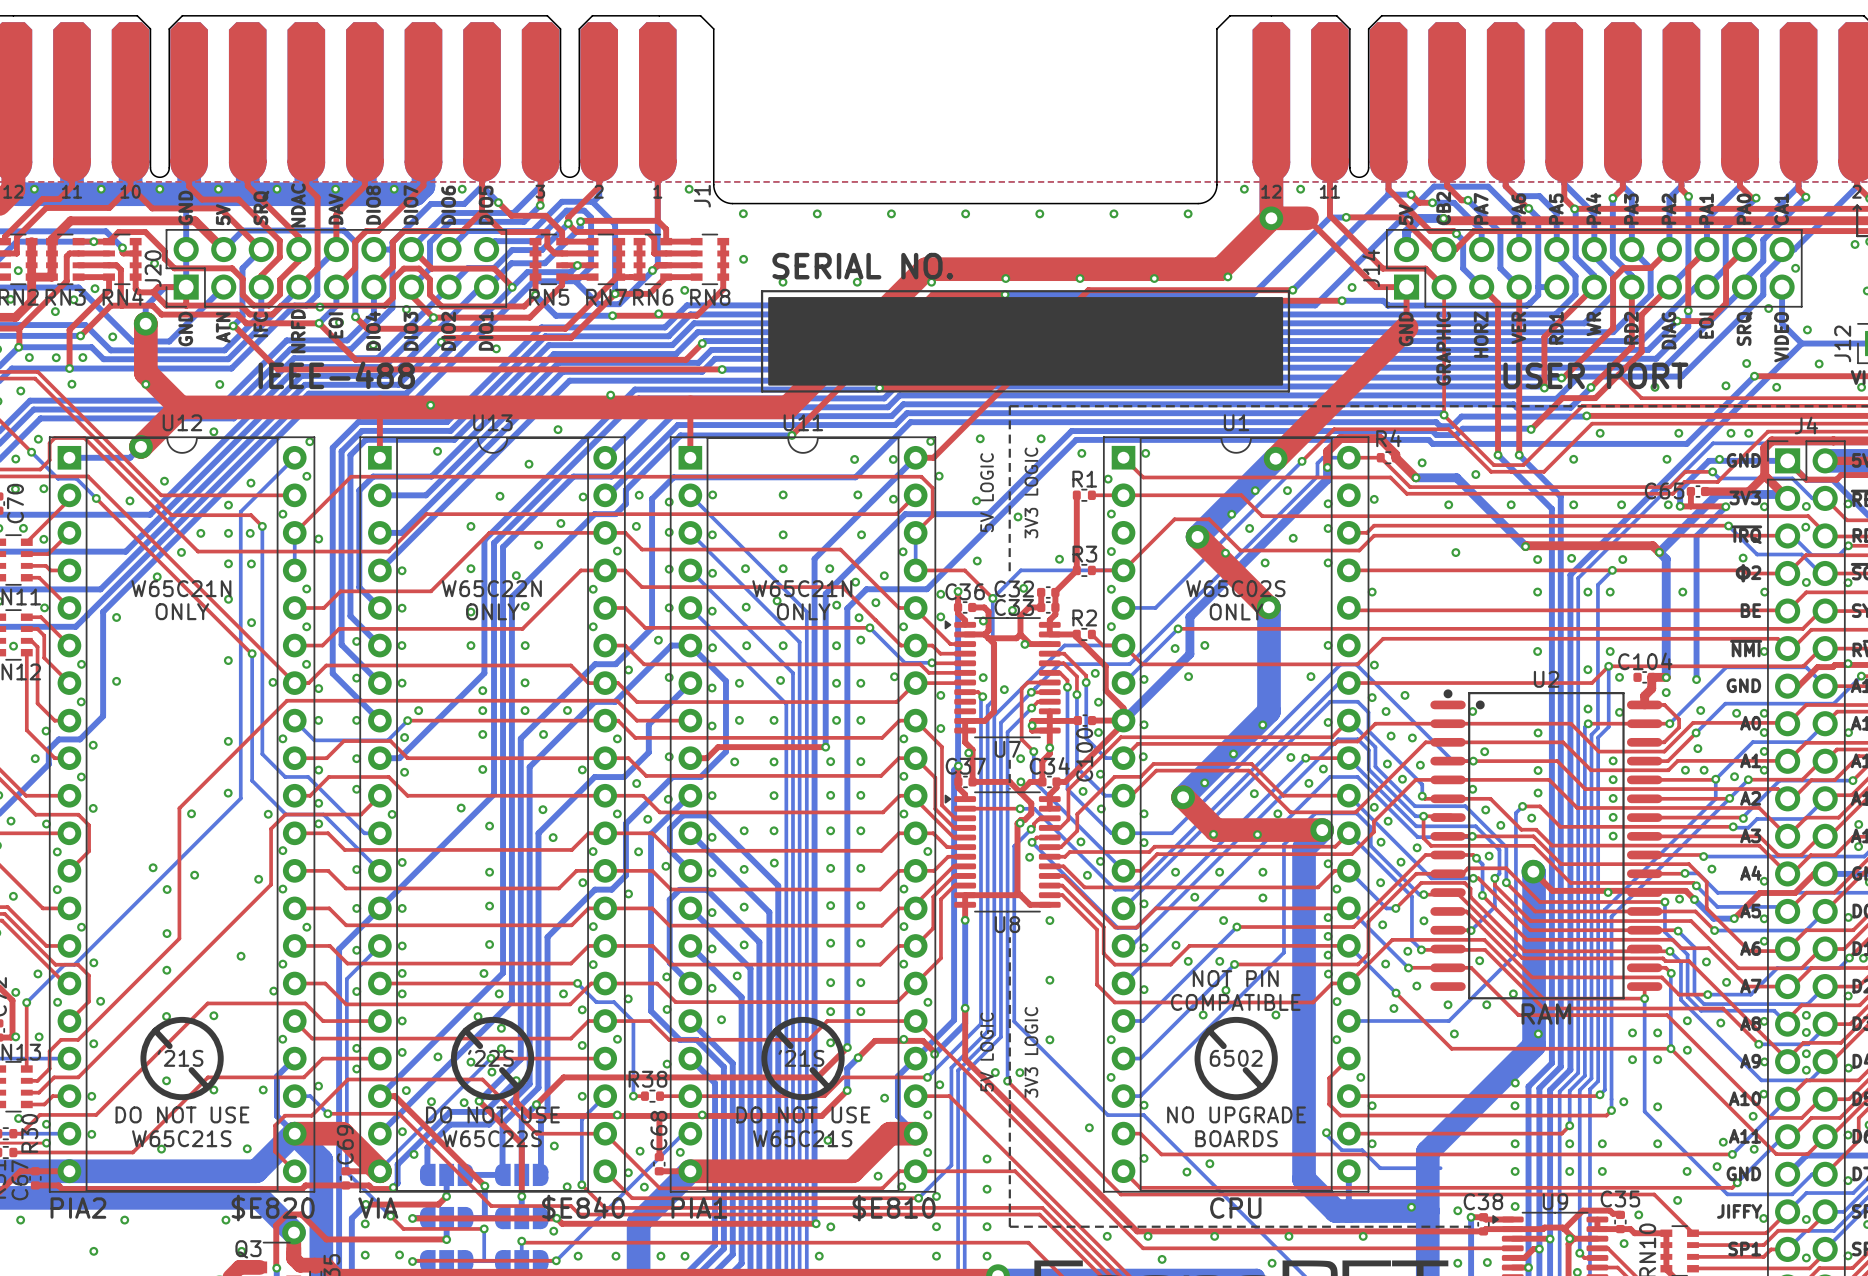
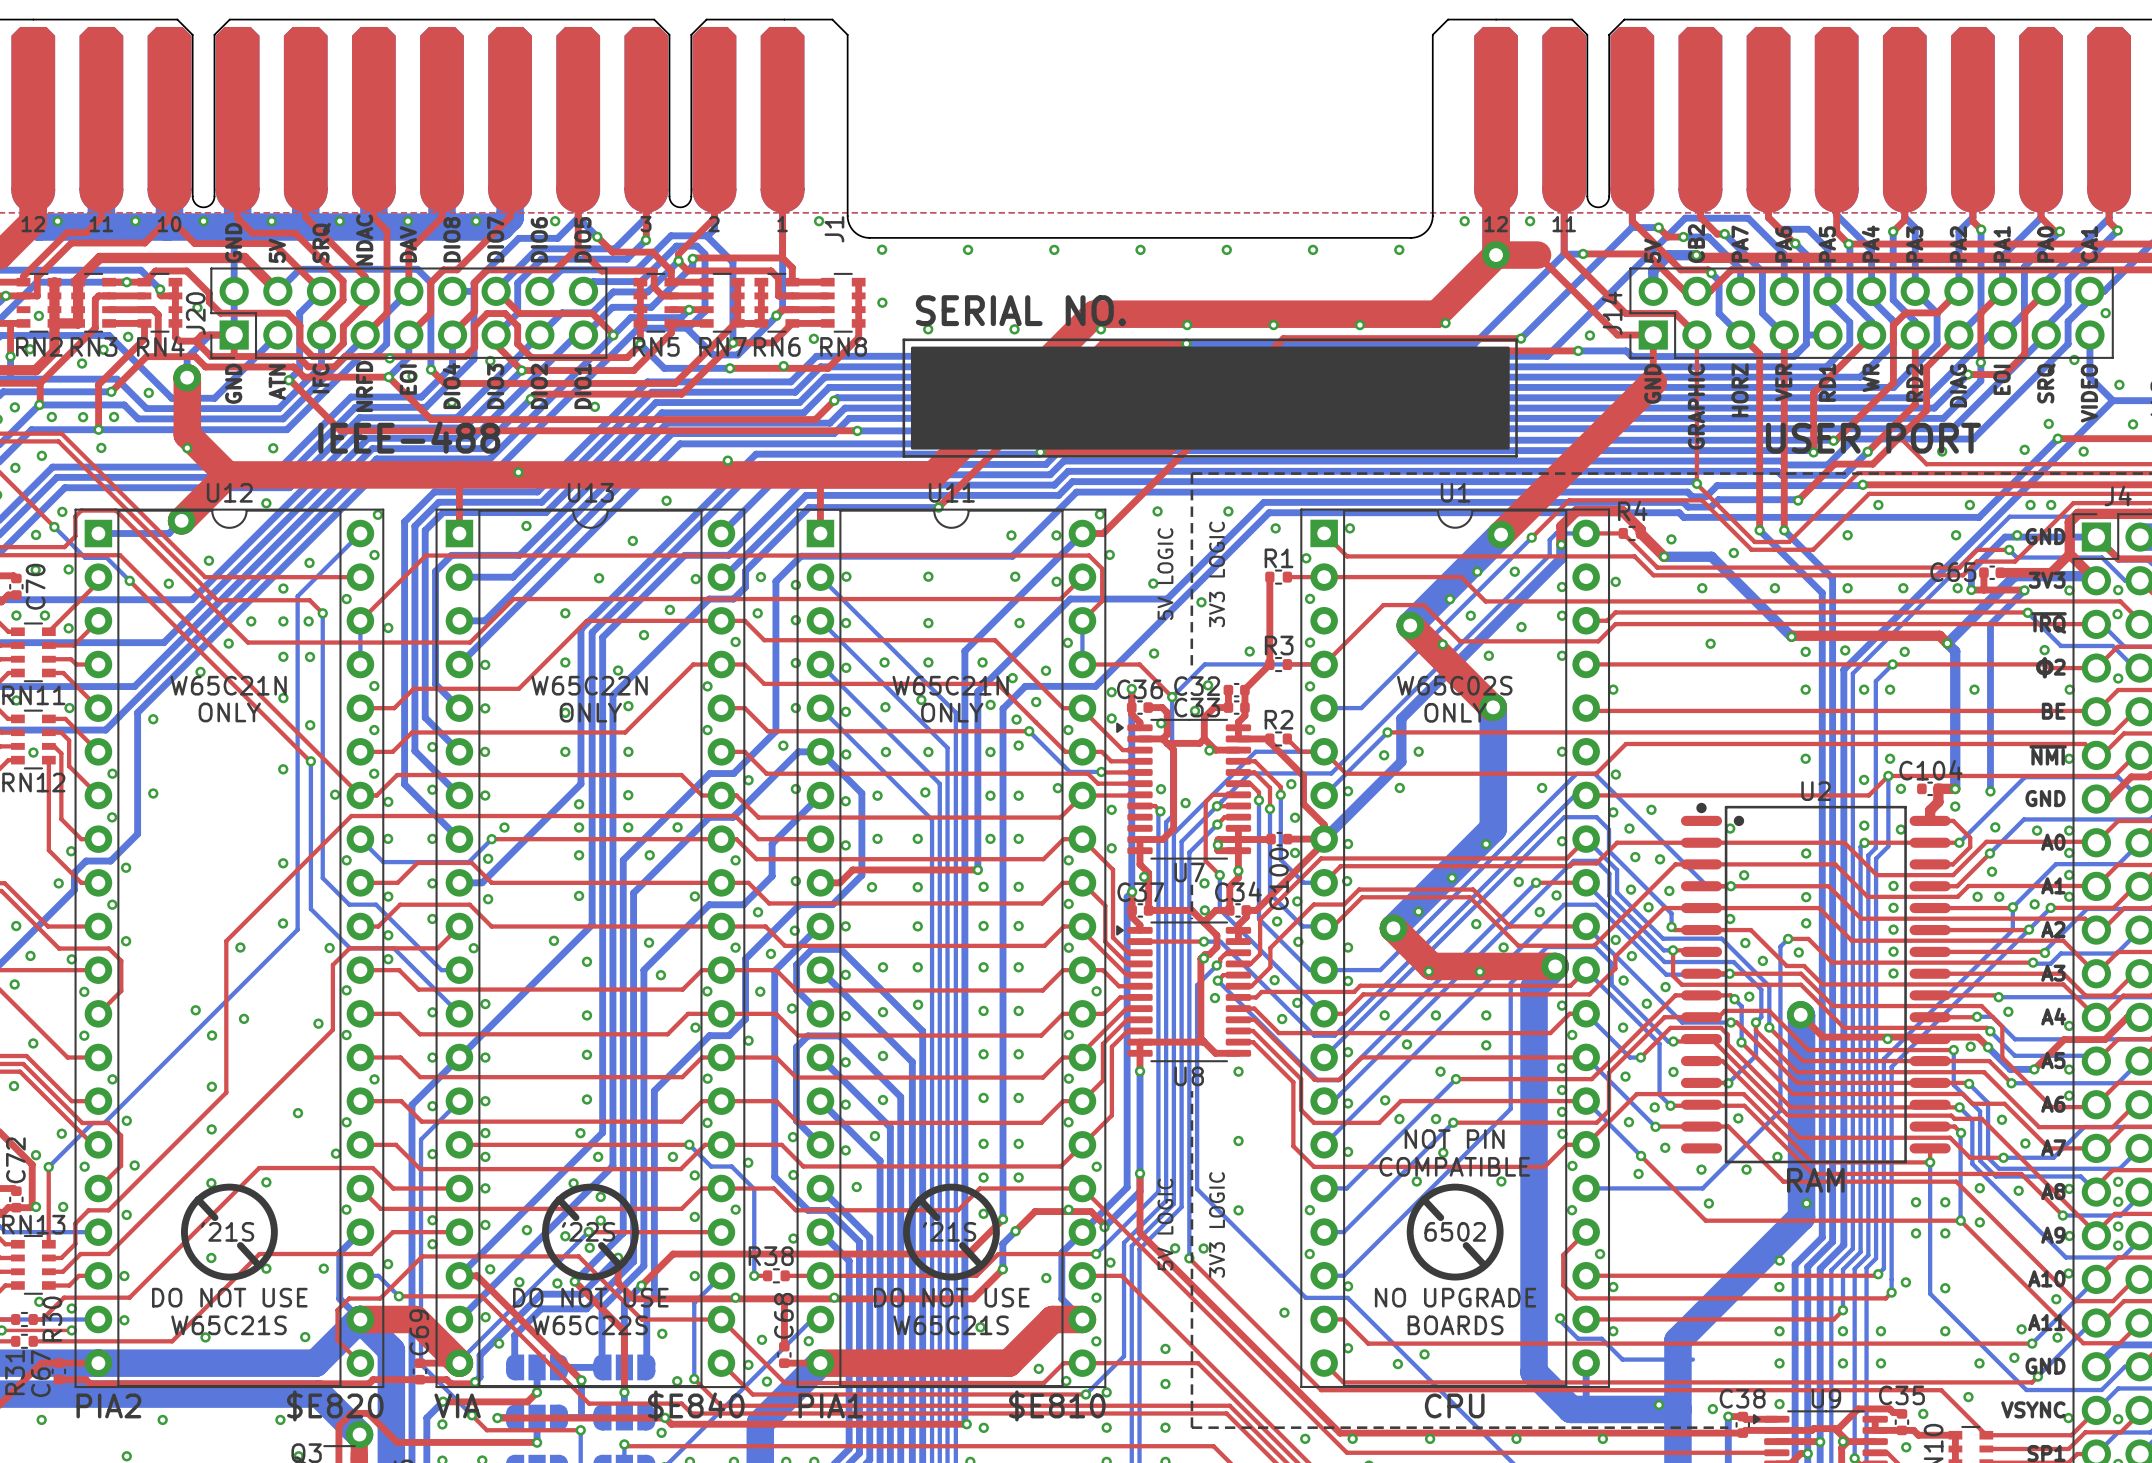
text: JIFFY (1739, 1211) -> VSYNC (2033, 1409)

